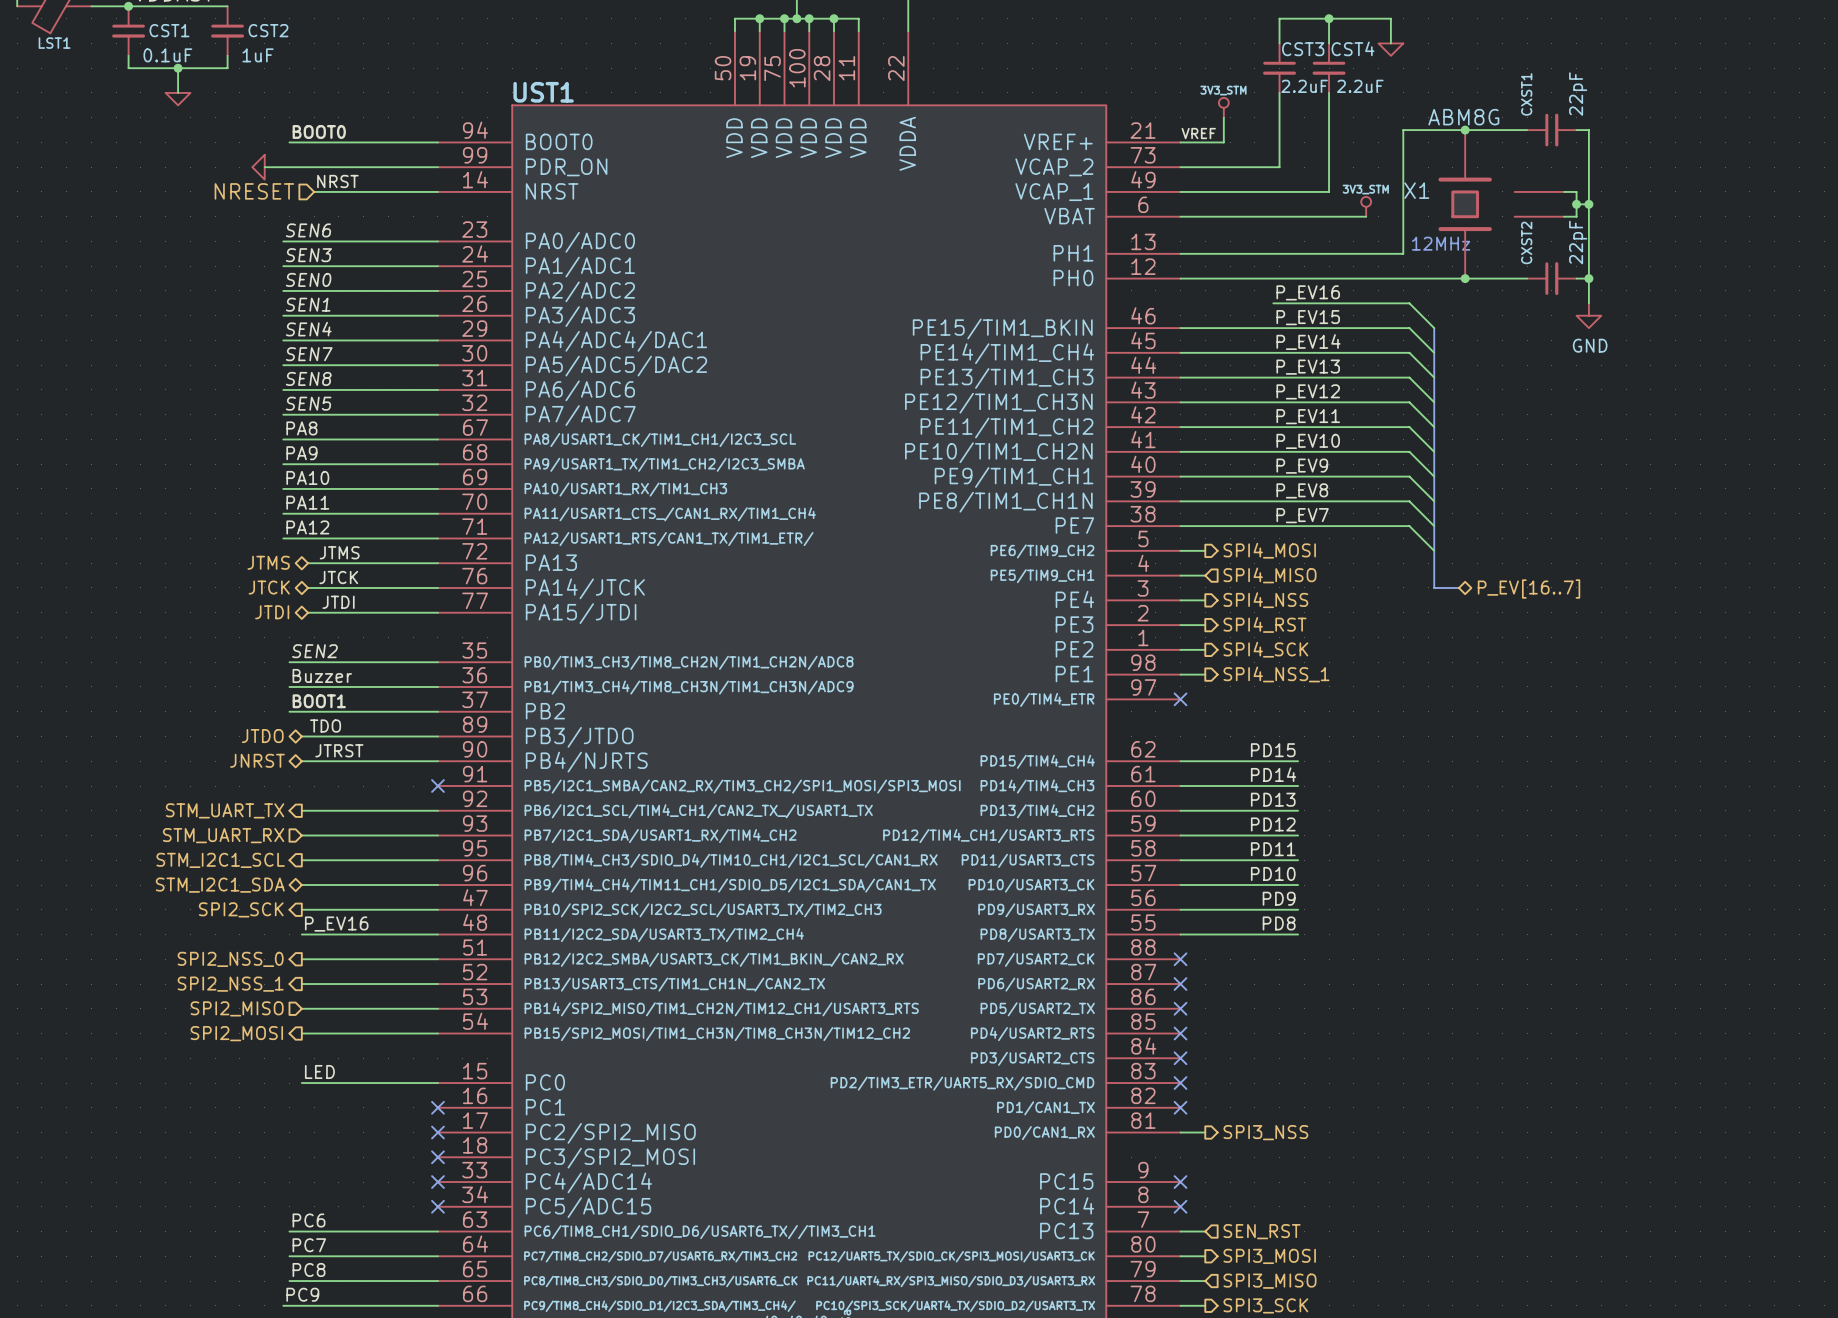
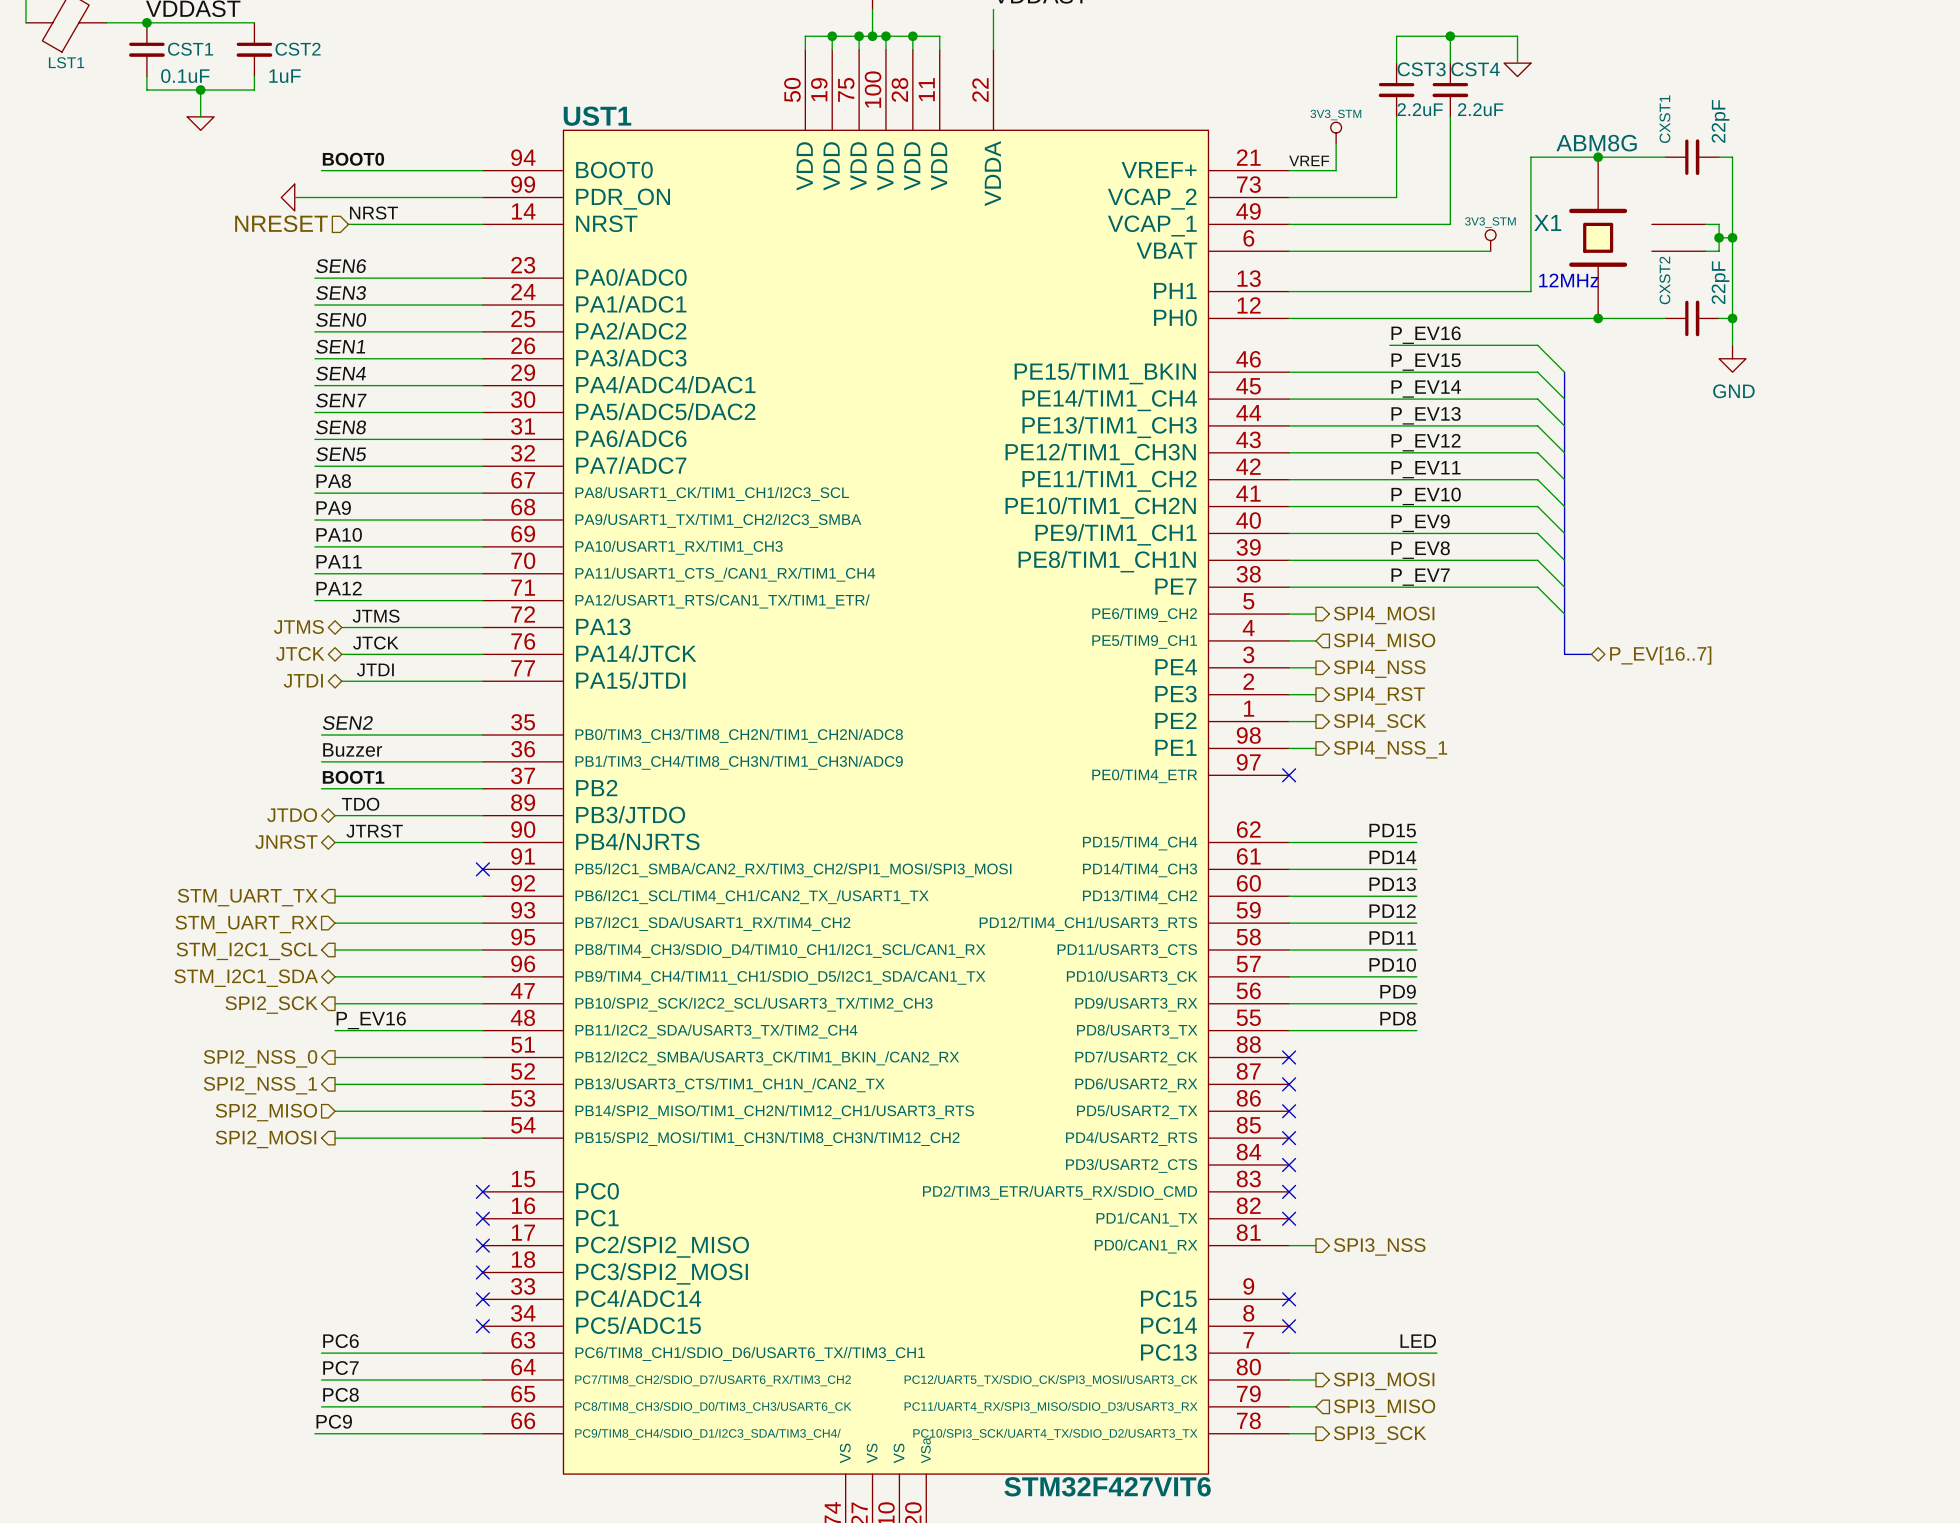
label: LED (319, 1071) -> none
wire: (301, 1083) (437, 1083) -> none
no-connect mark: none -> (482, 1191)
label: none -> LED (1418, 1341)
wire: none -> (1315, 1353) (1436, 1353)
hierarchical label: SEN_RST (1262, 1231) -> none

